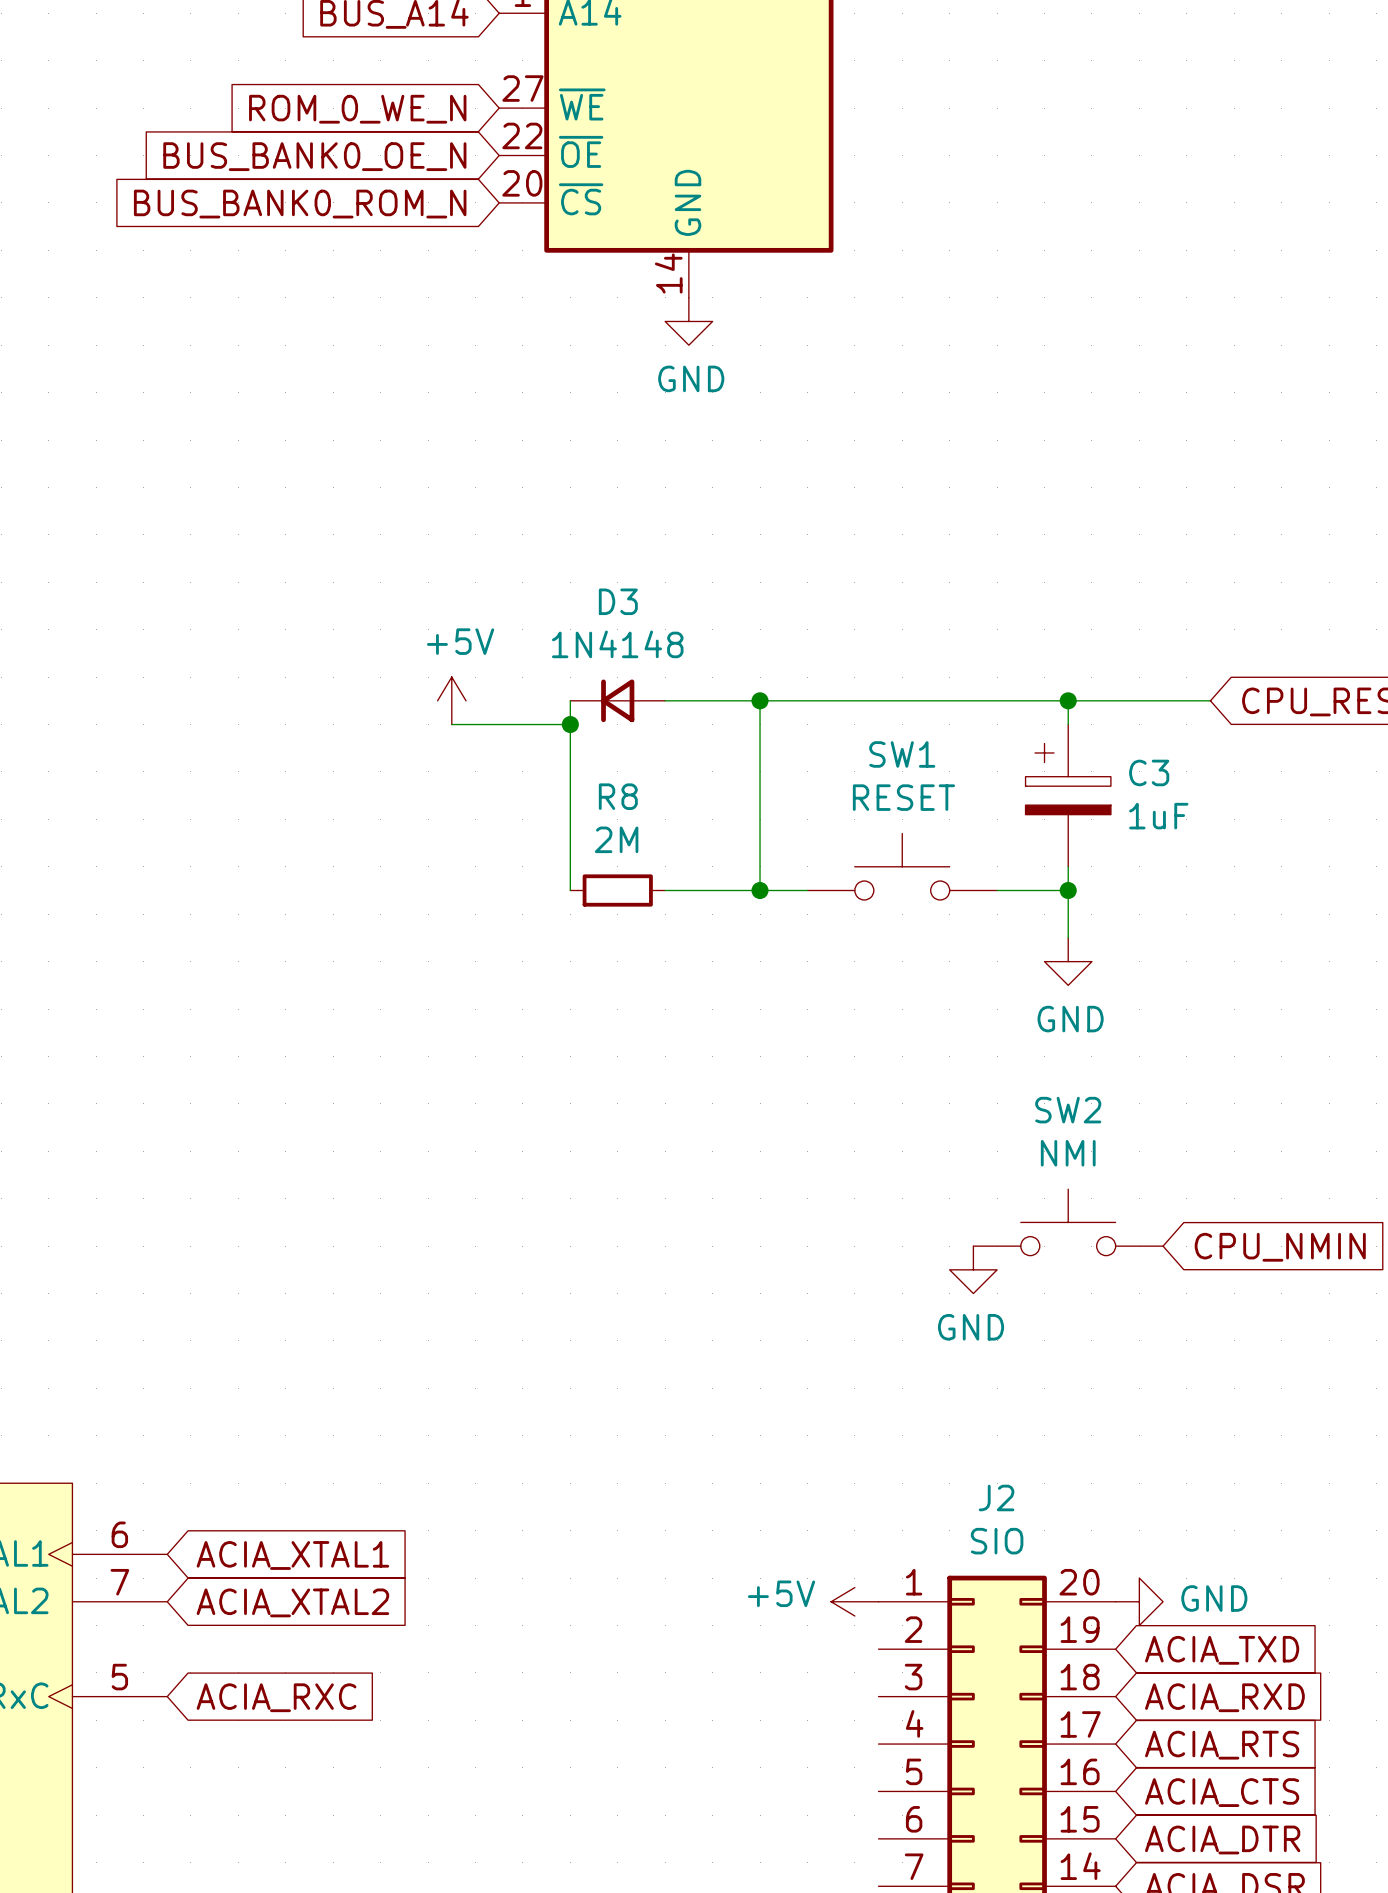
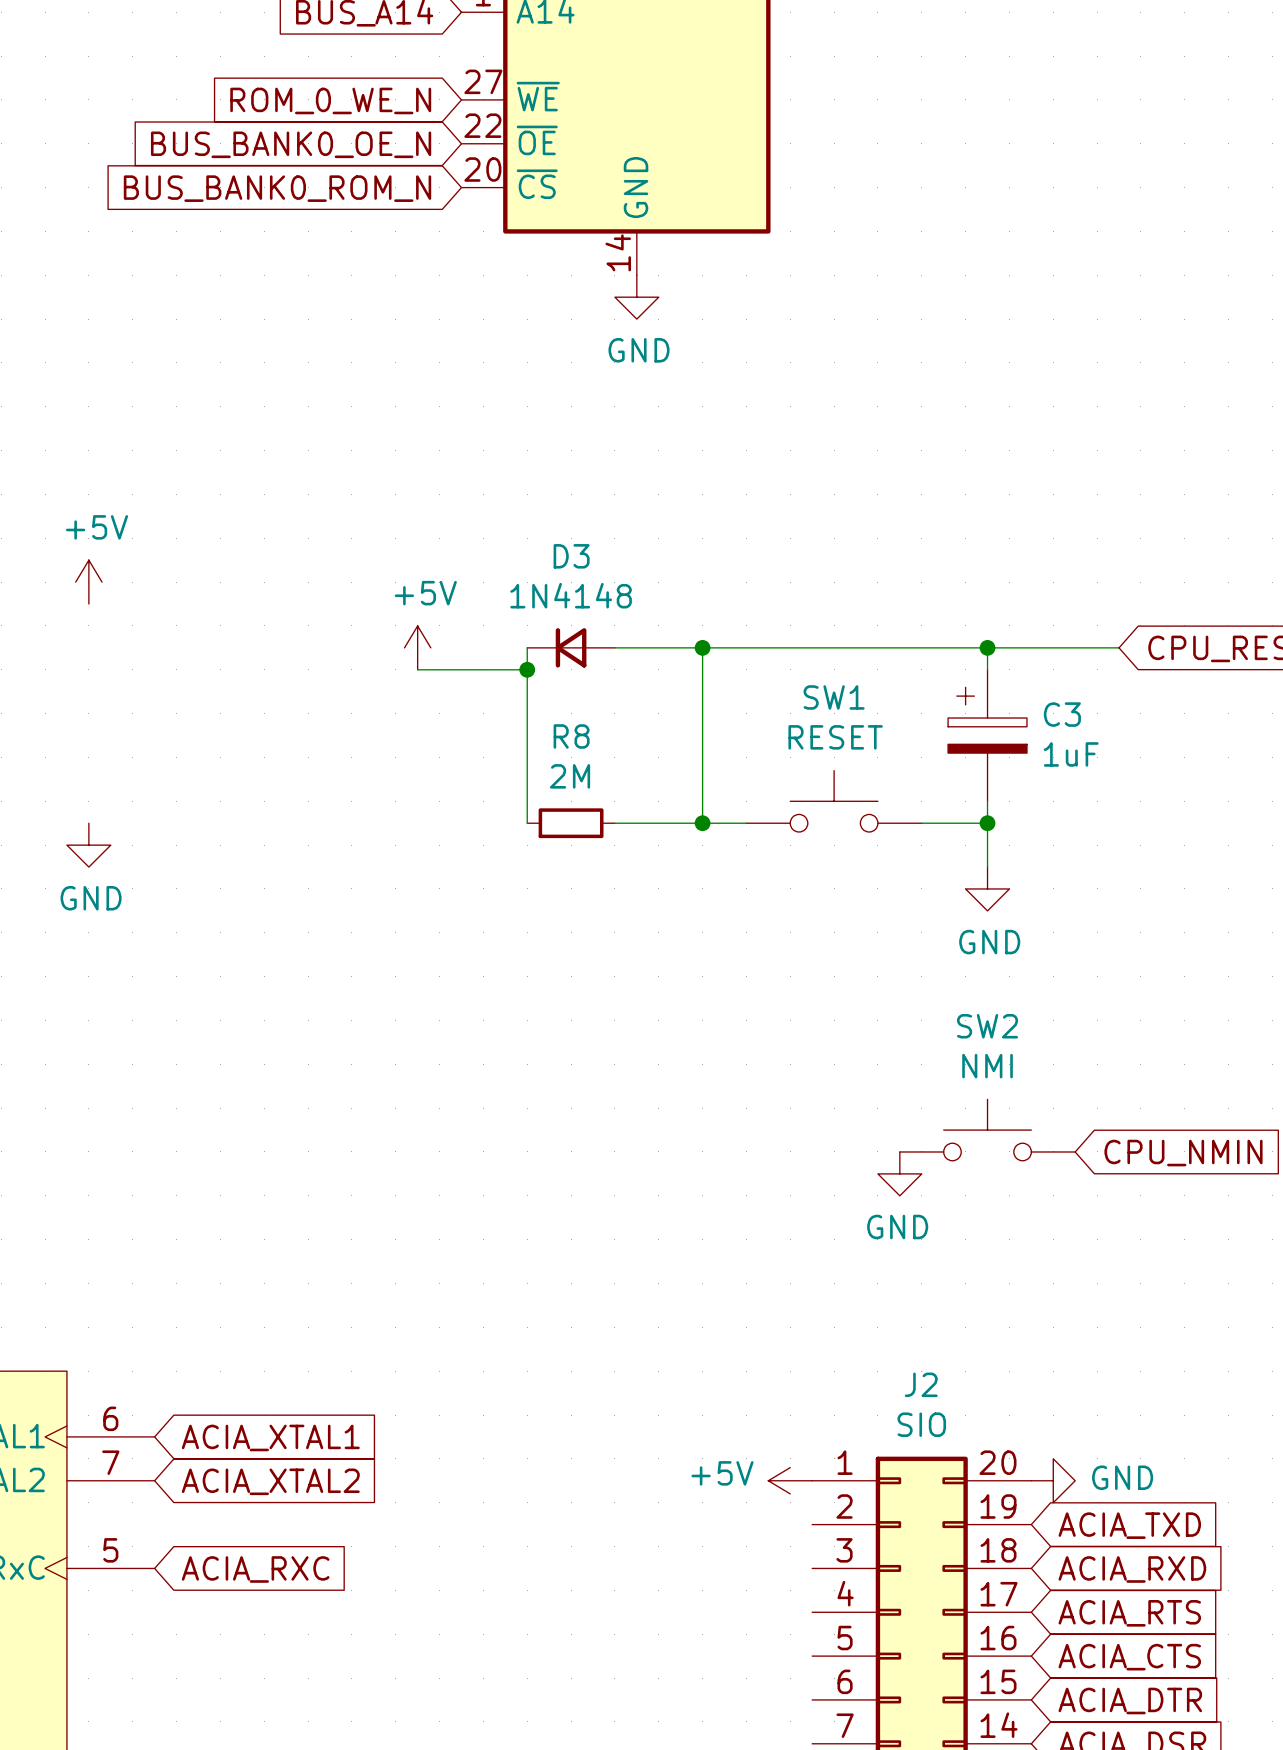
power symbol: none -> +5V (88, 582)
power symbol: none -> GND (88, 845)

